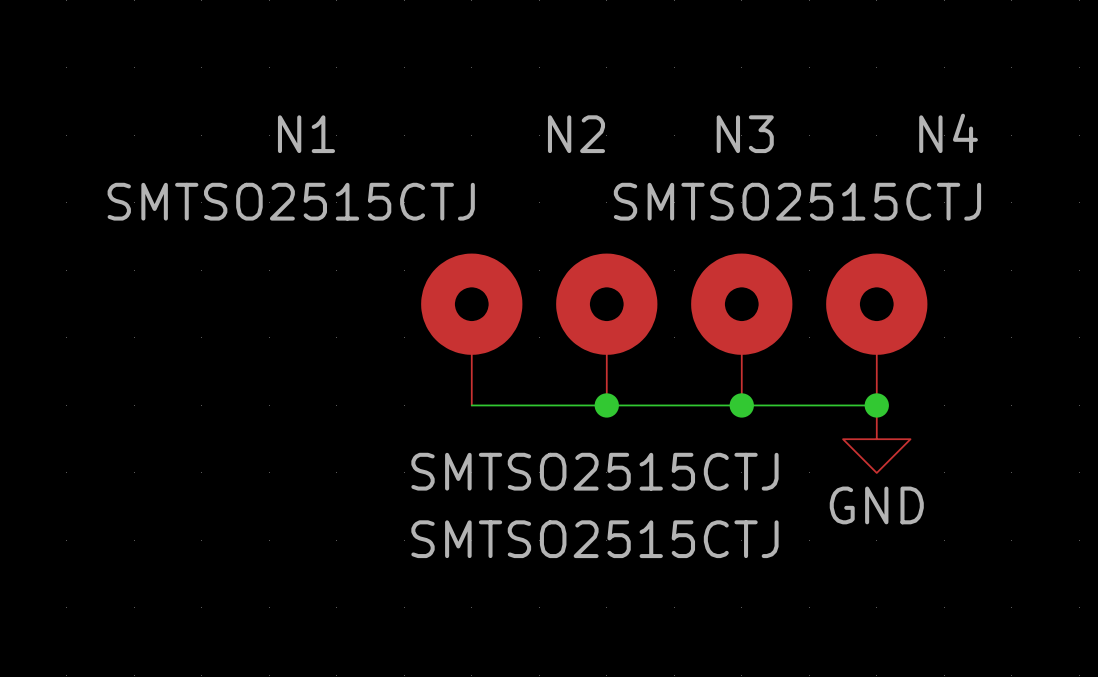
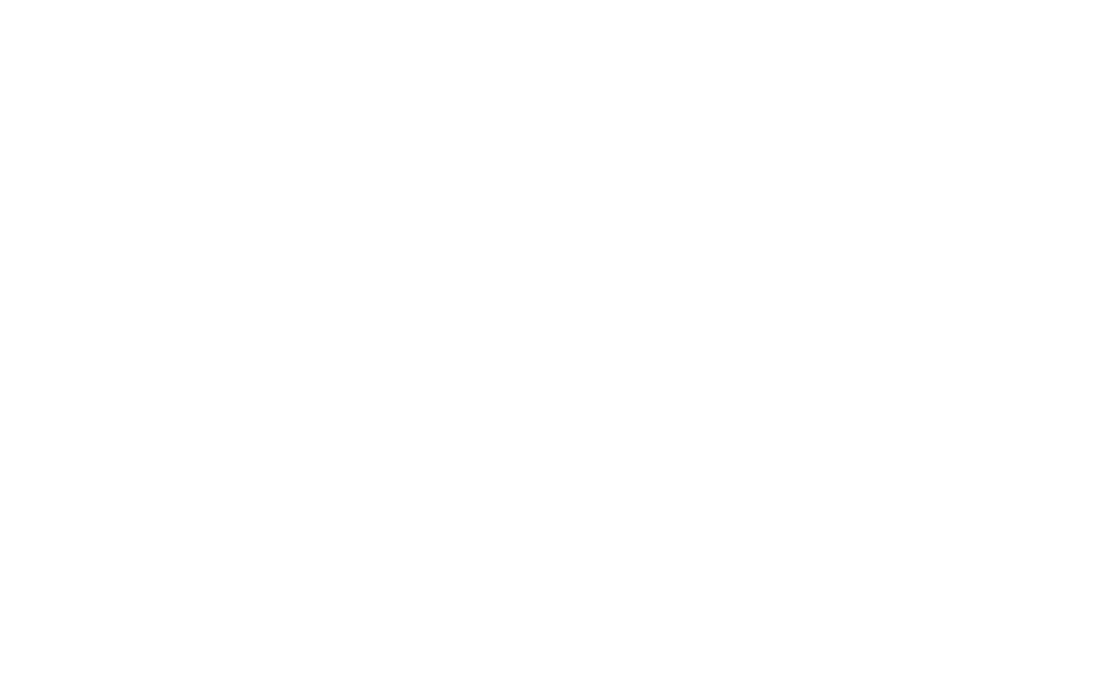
N1: SMTSO2515CTJ (471, 329) -> none
N2: SMTSO2515CTJ (606, 329) -> none
N3: SMTSO2515CTJ (741, 329) -> none
N4: SMTSO2515CTJ (876, 329) -> none
wire: (471, 405) (876, 405) -> none
junction: (606, 405) -> none
junction: (741, 405) -> none
junction: (876, 405) -> none
power symbol: GND (876, 439) -> none

